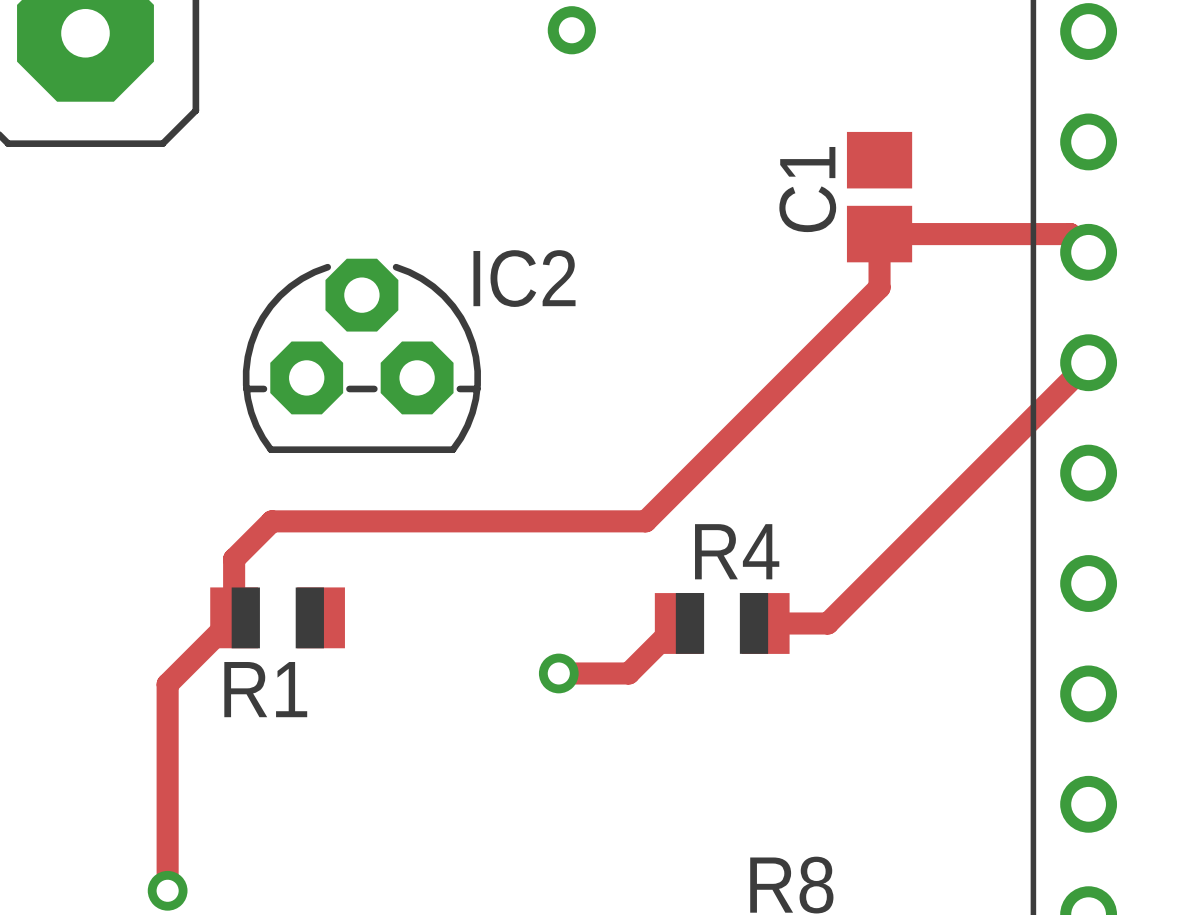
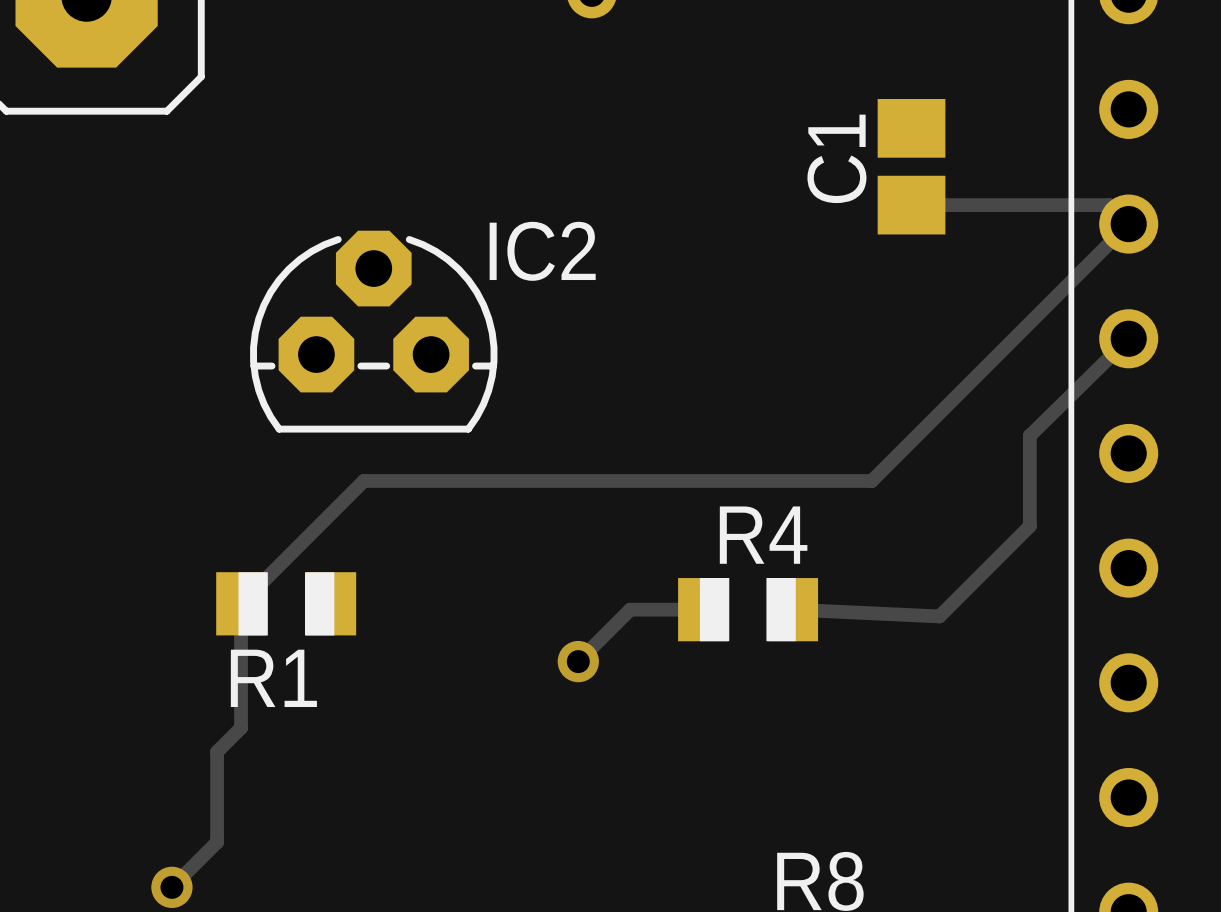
track: (879, 234) (879, 287) (645, 521) (271, 521) (234, 559) (234, 617) (167, 684) (167, 890) -> (1128, 224) (871, 480) (363, 480) (241, 603) (241, 727) (217, 751) (217, 842) (171, 887)
track width: thick (879, 234) (1070, 234) (1088, 252) -> thin (911, 205) (1109, 205) (1128, 224)
track: (1088, 362) (827, 623) (765, 623) -> (1128, 338) (1029, 435) (1029, 526) (939, 616) (793, 609)
track: (678, 623) (628, 673) (558, 673) -> (702, 609) (630, 609) (578, 661)

